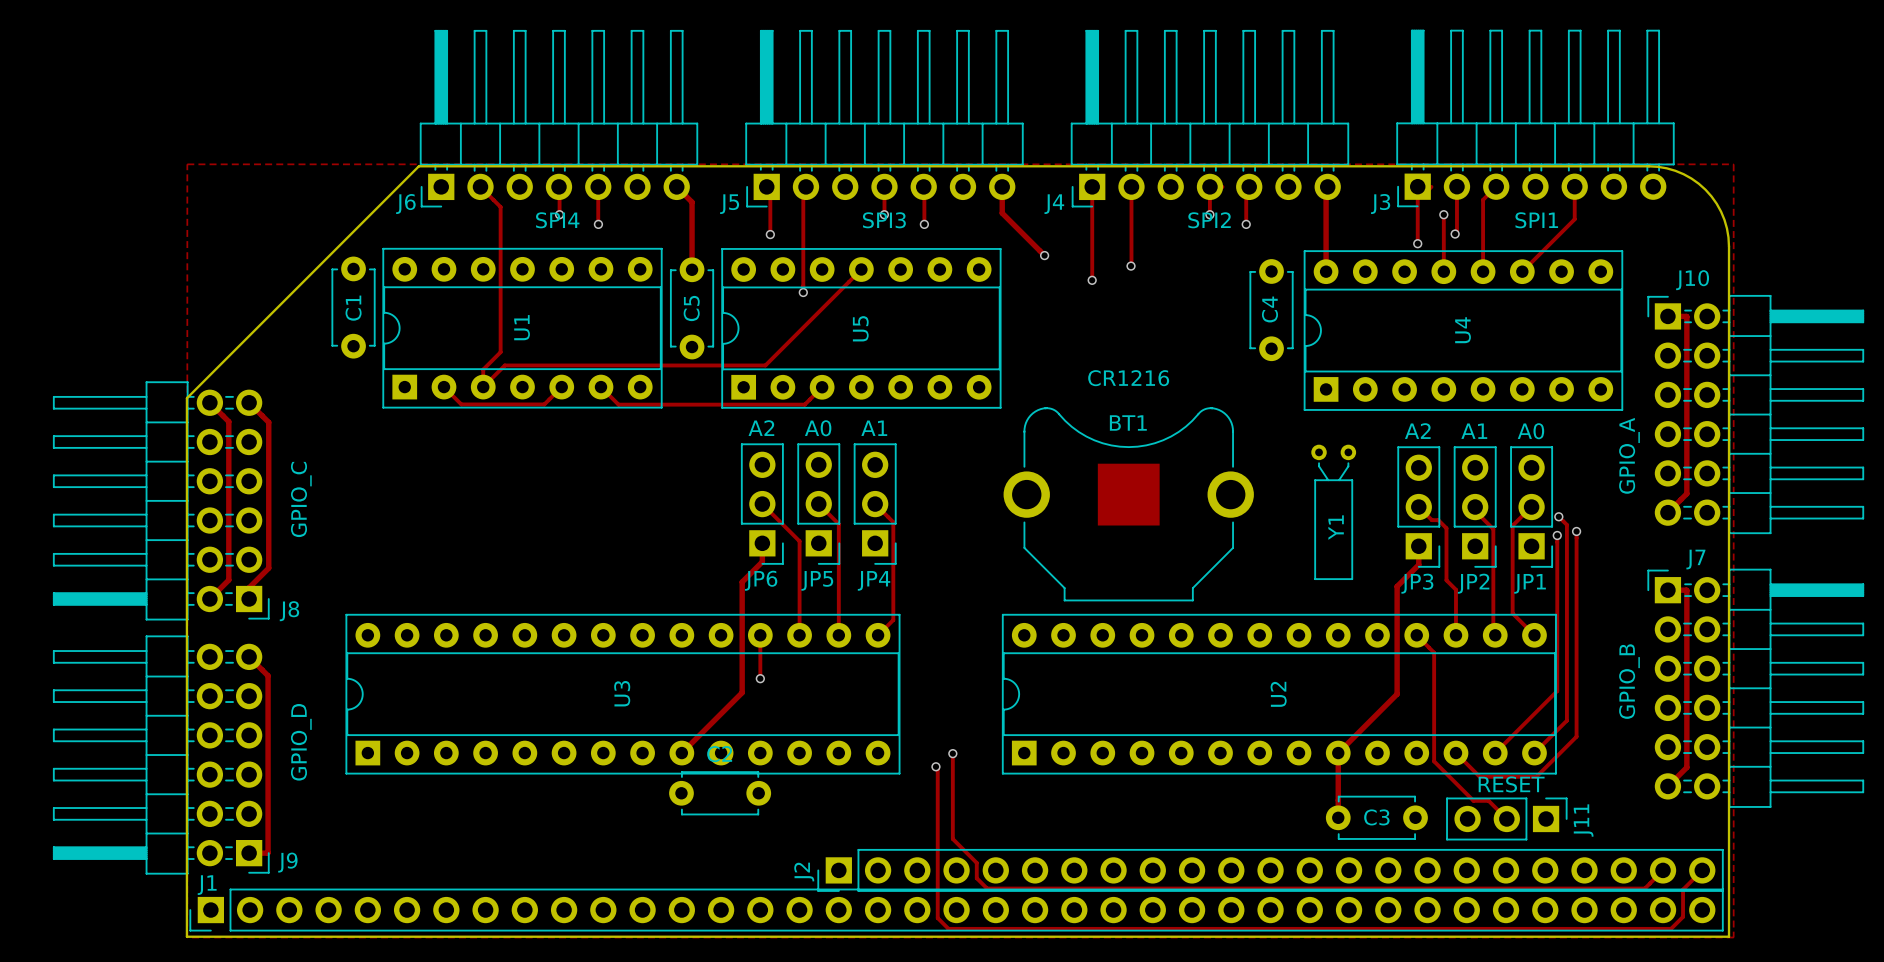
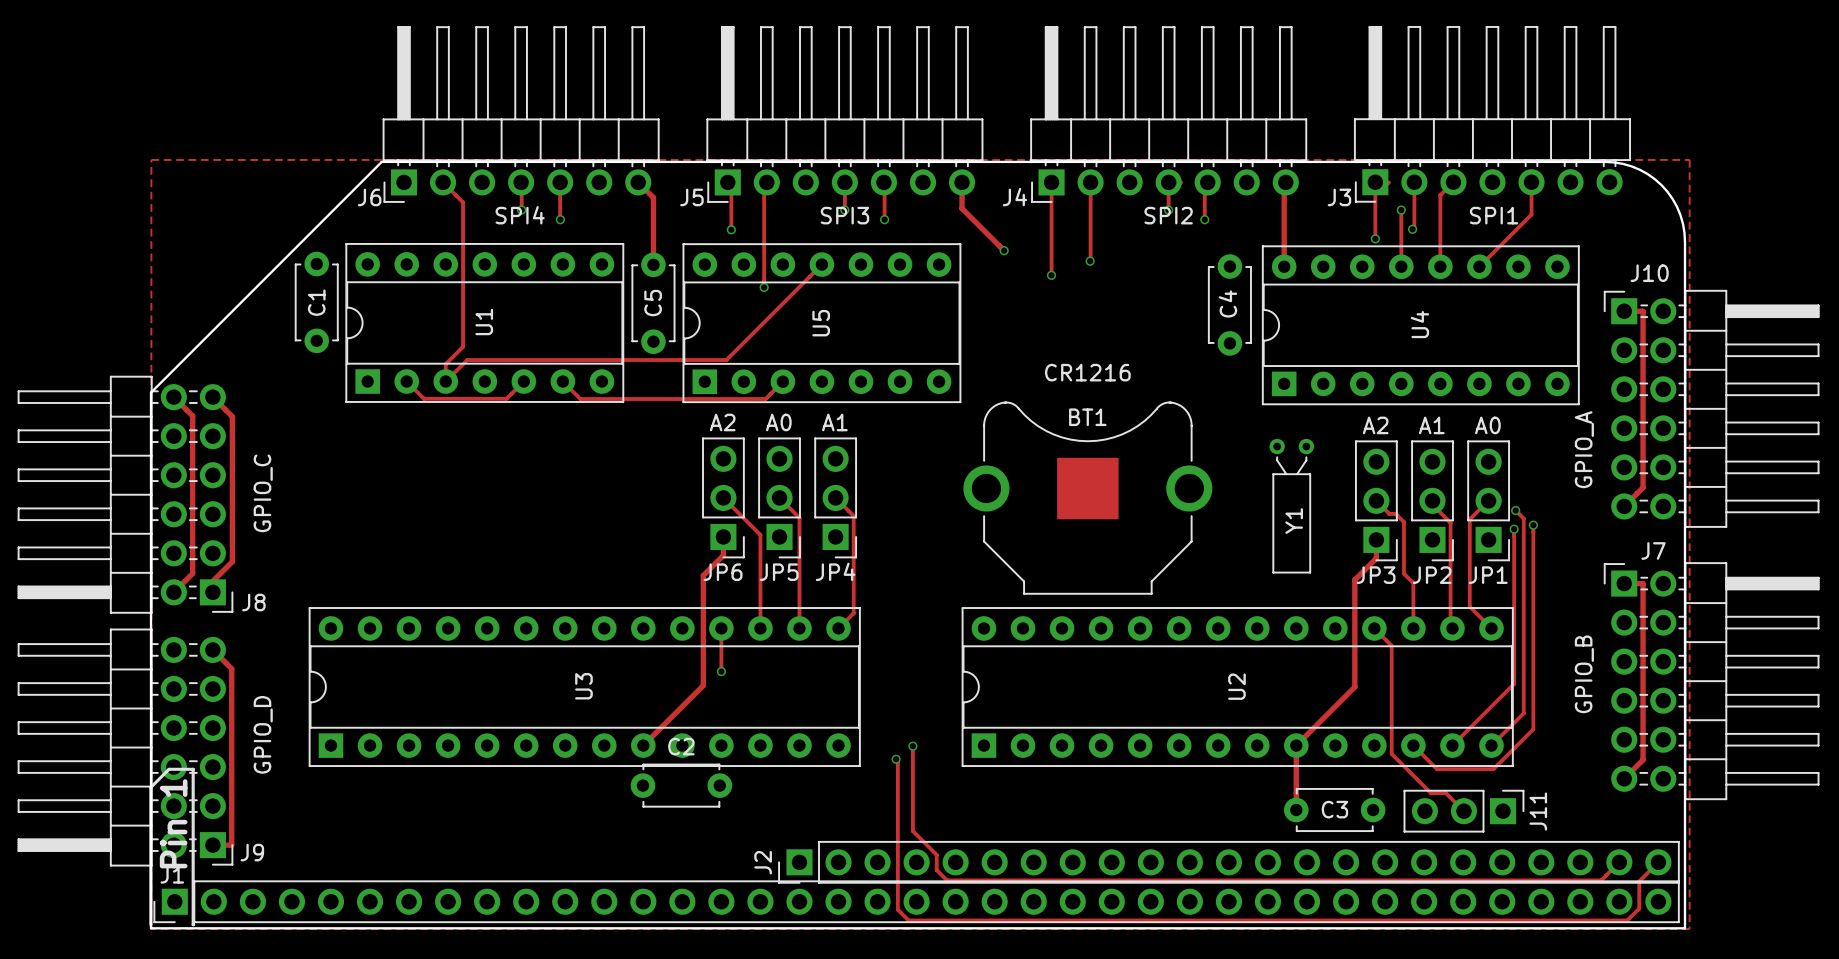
J11 value: RESET (1511, 784) -> none
text: none -> Pin 1 (173, 823)
line: none -> (150, 924) (150, 787) (169, 769) (193, 769) (193, 924)

